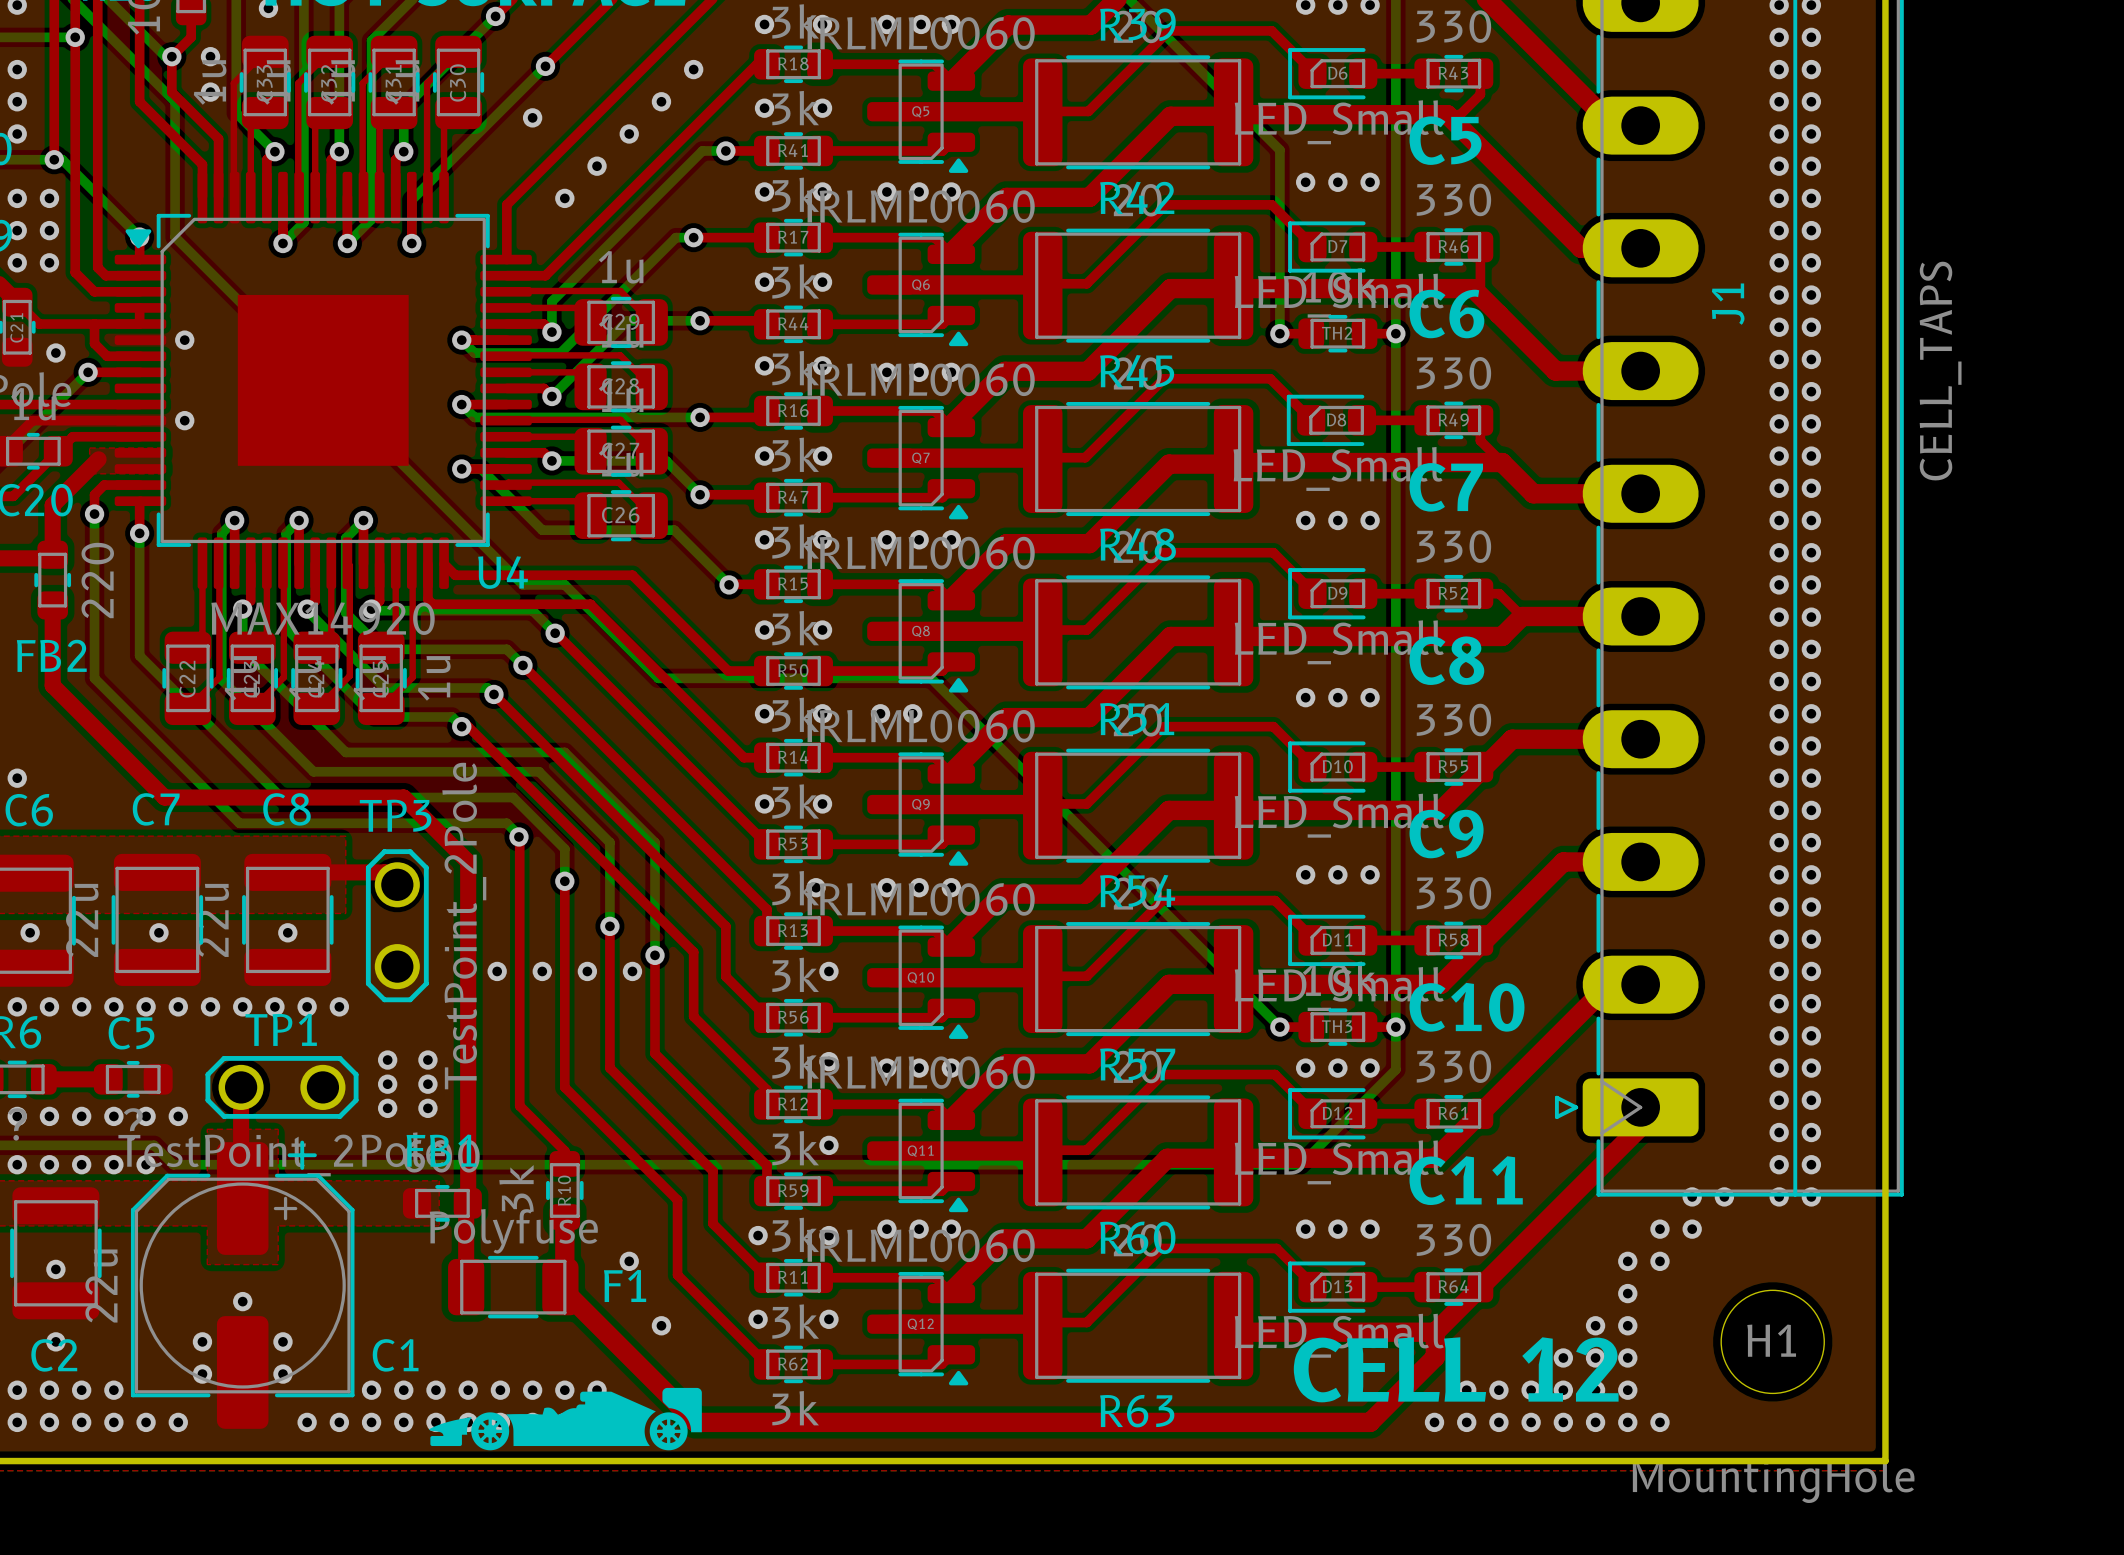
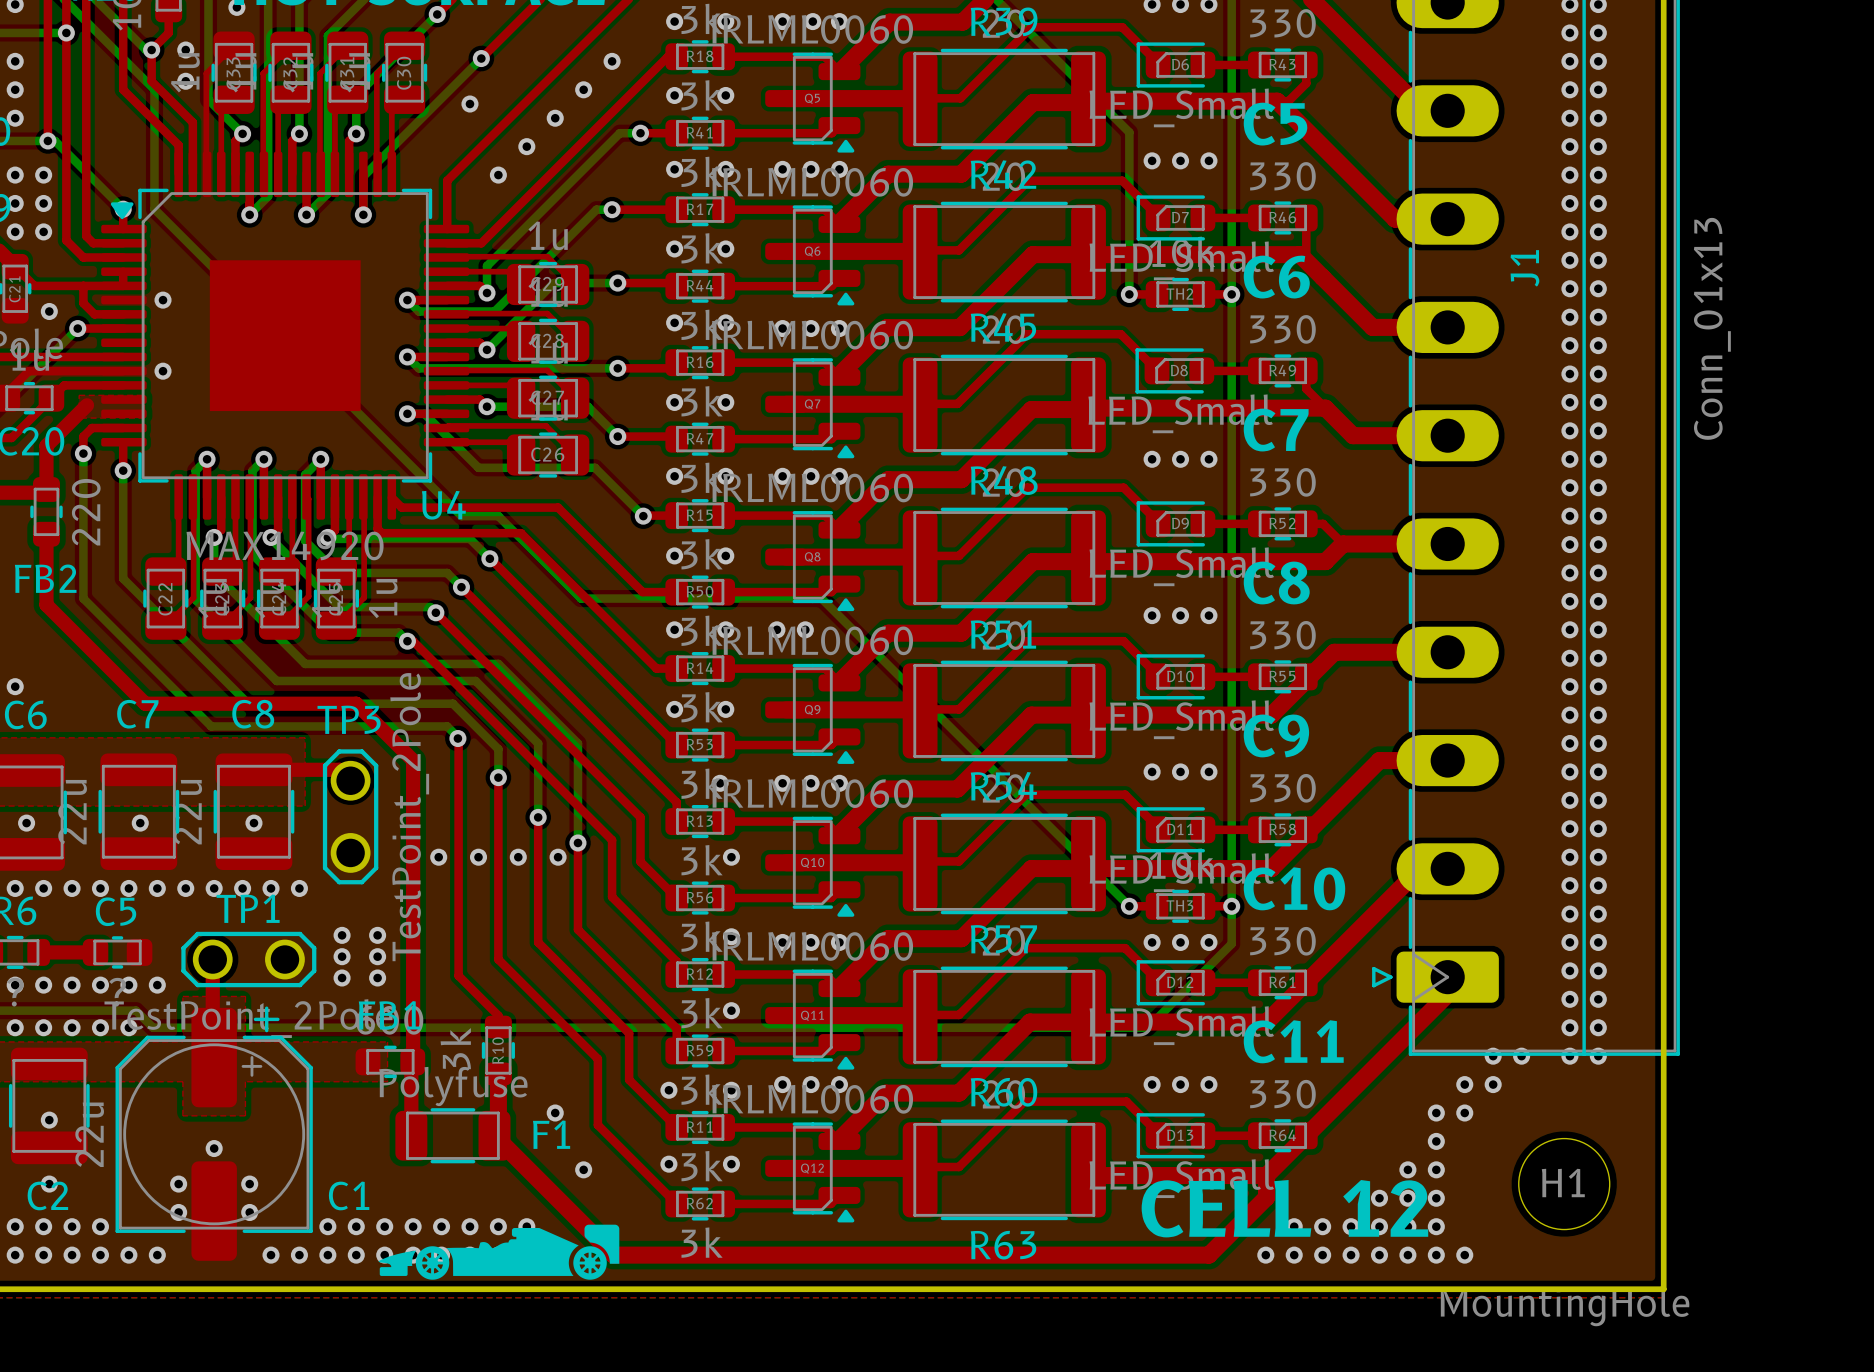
J1 value: CELL_TAPS (1940, 371) -> Conn_01x13 (1712, 328)

